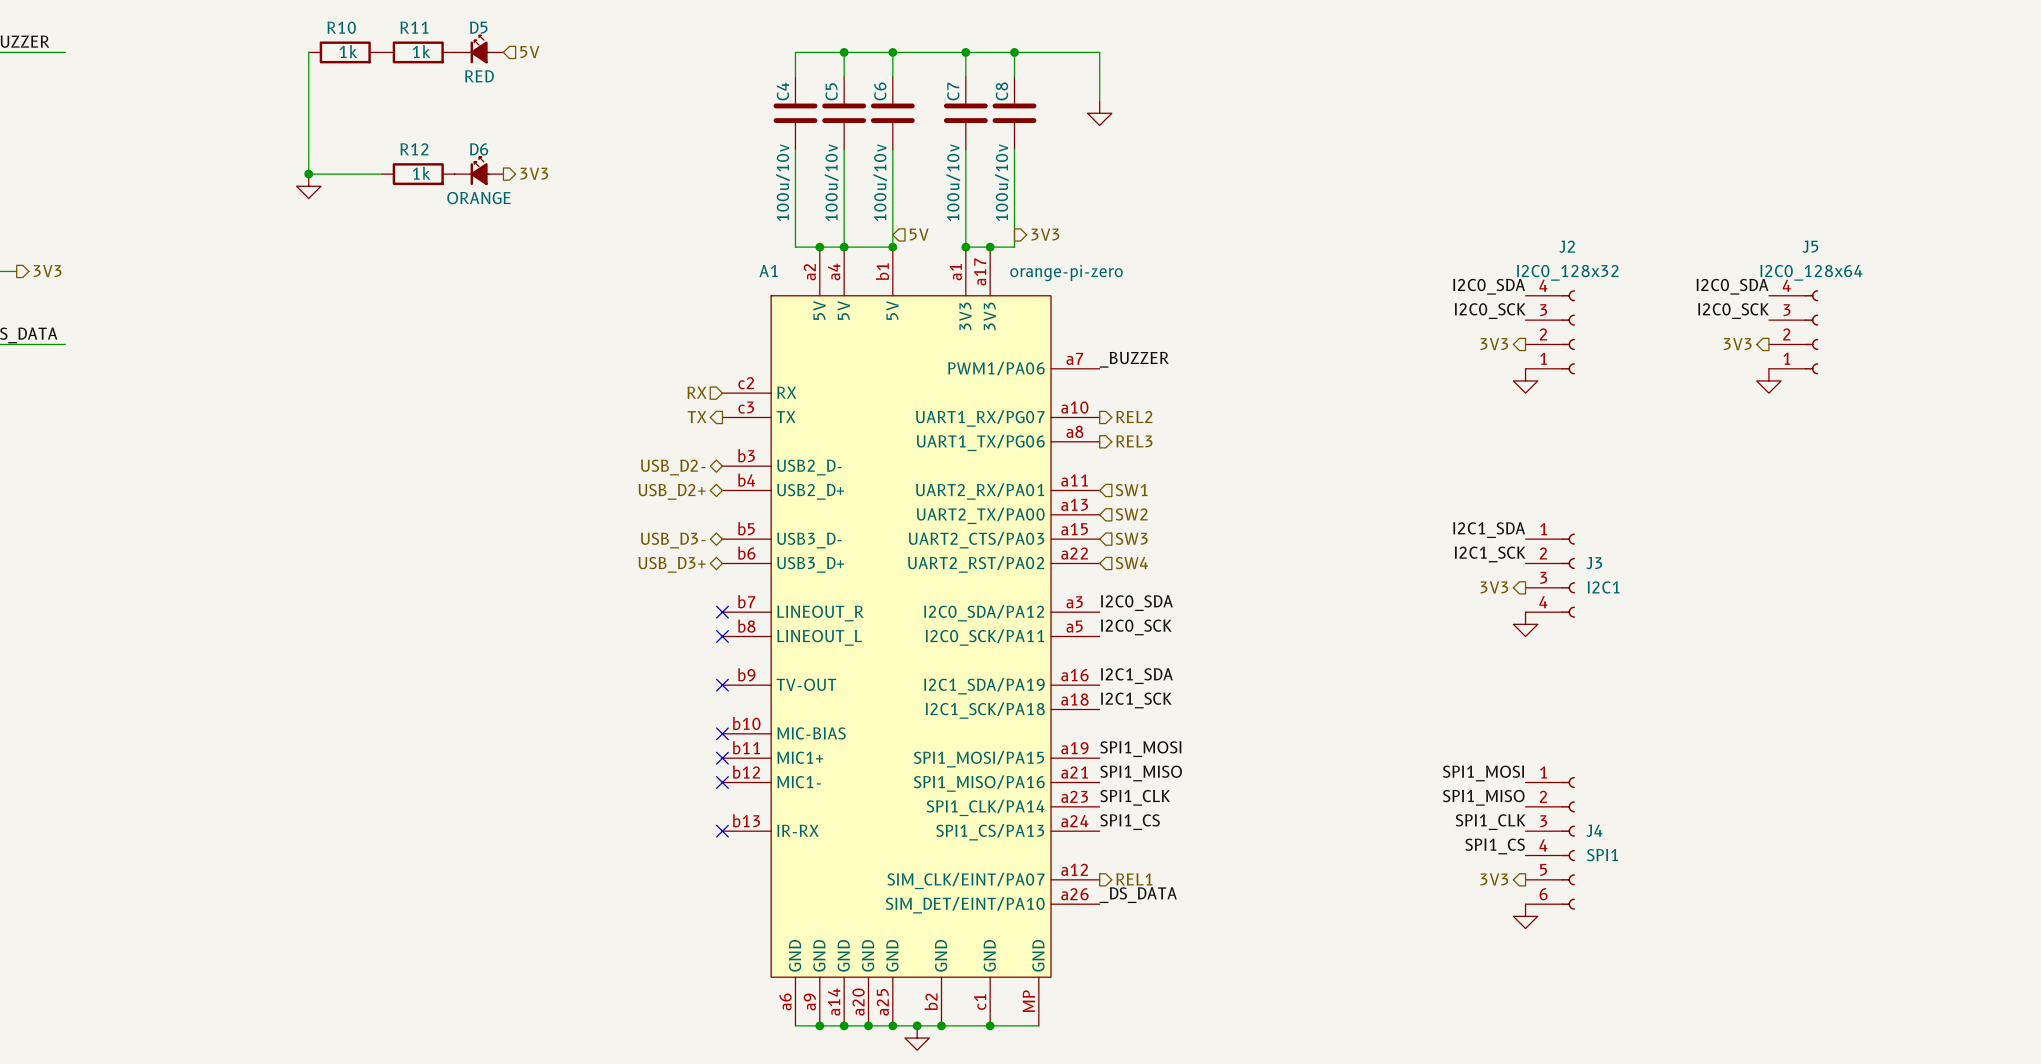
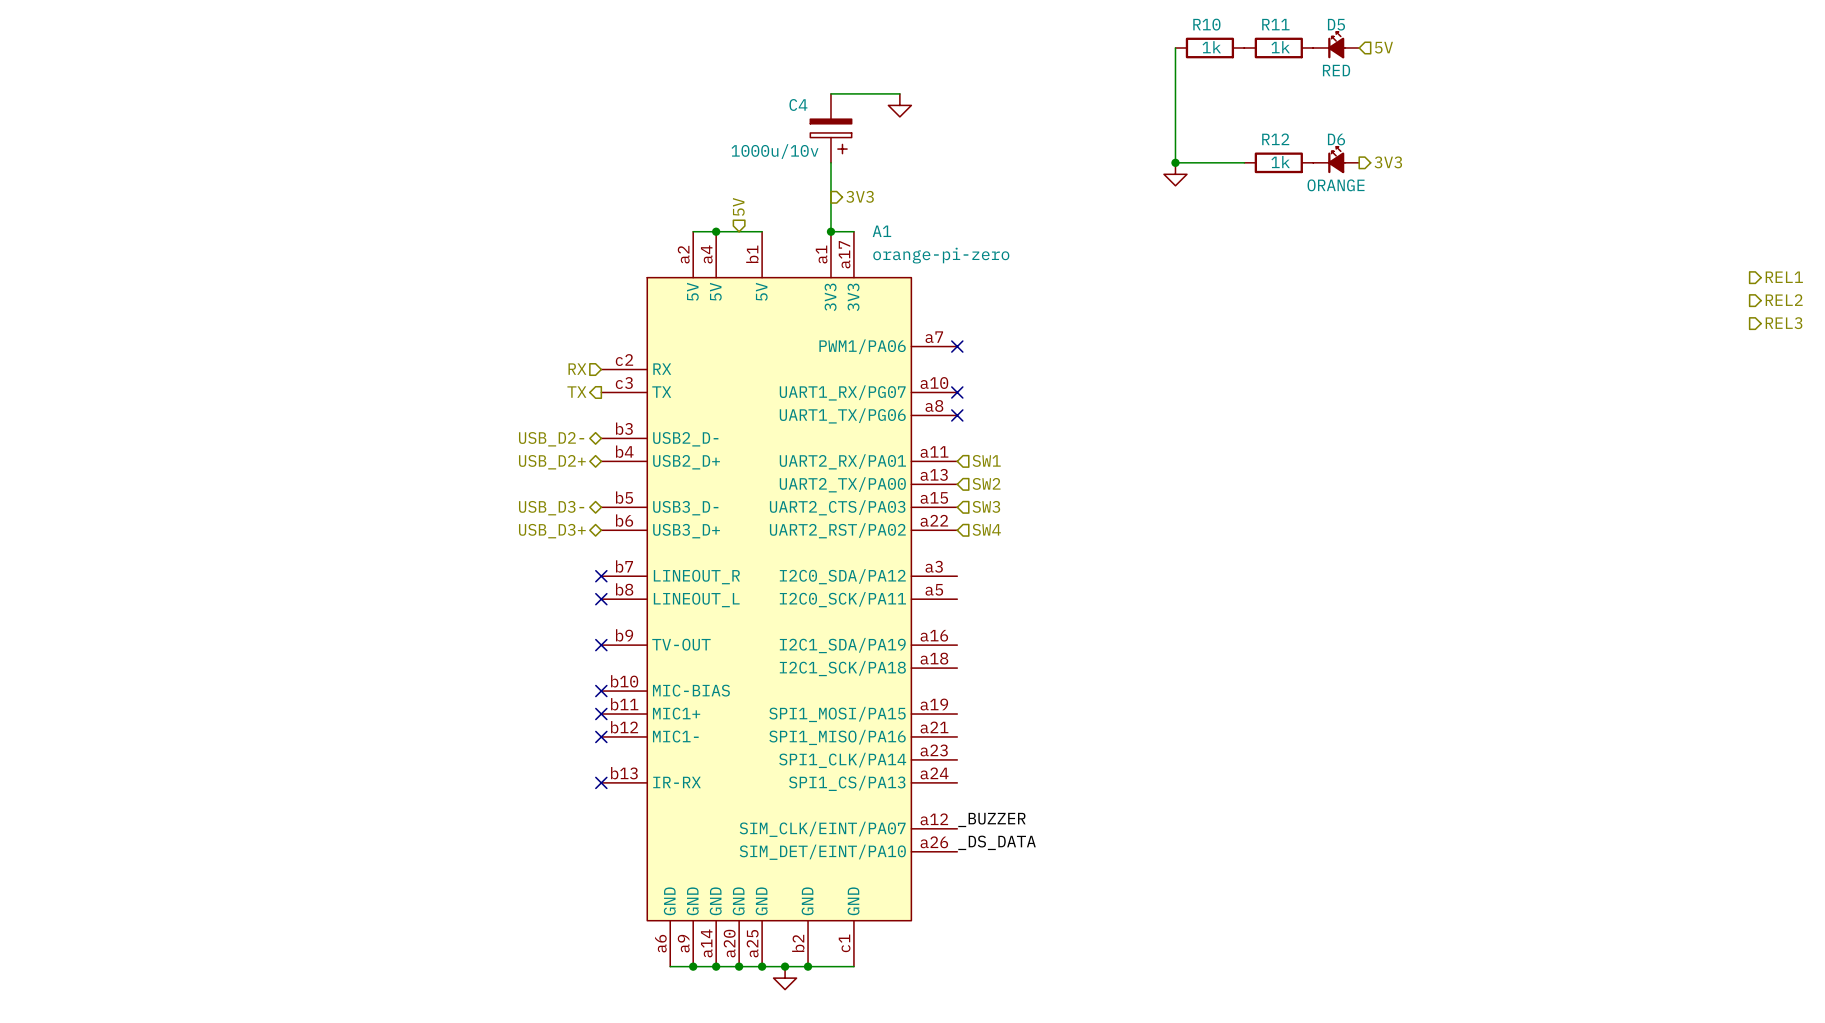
D5 position: (479, 49) -> (1336, 45)
wire: (308, 52) (308, 174) (381, 174) -> none
R10 position: (345, 52) -> (1209, 47)
R11 position: (418, 52) -> (1278, 47)
hierarchical label: 5V (529, 52) -> none
wire: (844, 52) (844, 76) -> none
junction: (844, 52) -> none
wire: (892, 52) (892, 76) -> none
junction: (892, 52) -> none
wire: (965, 52) (965, 76) -> none
junction: (965, 52) -> none
wire: (1014, 52) (1014, 76) -> none
junction: (1014, 52) -> none
wire: none -> (1175, 47) (1175, 162) (1244, 162)
hierarchical label: none -> 5V (1383, 47)
C4 symbol: [773, 76, 818, 150] -> [810, 93, 852, 163]
wire: (795, 76) (795, 52) (1099, 52) (1099, 101) -> none
C4 name position: C4 (782, 91) -> C4 (798, 104)
wire: none -> (830, 93) (899, 93)
C5: 100u/10v (844, 113) -> none
C6: 100u/10v (892, 113) -> none
C7: 100u/10v (965, 113) -> none
C8: 100u/10v (1014, 113) -> none
power symbol position: (1099, 113) -> (899, 105)
wire: (795, 149) (795, 247) (819, 247) -> none
wire: (844, 149) (844, 247) -> none
wire: (892, 149) (892, 247) -> none
wire: (1014, 149) (1014, 247) (990, 247) -> none
D6 position: (479, 171) -> (1336, 159)
hierarchical label: 3V3 (534, 173) -> none
hierarchical label: none -> 3V3 (1388, 162)
junction: (308, 174) -> none
R12 position: (418, 174) -> (1278, 162)
junction: none -> (1175, 162)
C4 value: 100u/10v (782, 182) -> 1000u/10v (774, 151)
power symbol: (308, 186) -> none
power symbol: none -> (1175, 174)
hierarchical label rotation: 0° (919, 234) -> 90° counterclockwise (738, 206)
hierarchical label position: 5V (919, 234) -> 5V (738, 206)
hierarchical label position: 3V3 (1045, 234) -> 3V3 (860, 196)
A1 symbol: [722, 247, 1100, 1026] -> [601, 231, 958, 967]
junction: (819, 247) -> none
junction: (892, 247) -> none
junction: (990, 247) -> none
A1 name position: A1 (768, 270) -> A1 (881, 231)
label: I2C0_SDA (1489, 286) -> none
label: I2C0_SDA (1732, 286) -> none
hierarchical label: none -> REL1 (1784, 277)
label: I2C0_SCK (1490, 311) -> none
label: I2C0_SCK (1733, 311) -> none
hierarchical label: none -> REL2 (1784, 300)
J2: I2C0_128x32 (1550, 332) -> none
J5: I2C0_128x64 (1793, 332) -> none
hierarchical label: 3V3 (1494, 344) -> none
hierarchical label: 3V3 (1737, 344) -> none
hierarchical label: none -> REL3 (1784, 323)
label: _BUZZER (1134, 359) -> none
no-connect mark: none -> (957, 346)
power symbol: (1525, 380) -> none
power symbol: (1768, 380) -> none
no-connect mark: none -> (957, 392)
hierarchical label: REL2 (1134, 417) -> none
no-connect mark: none -> (957, 415)
hierarchical label: REL3 (1134, 441) -> none
label: I2C1_SDA (1489, 530) -> none
label: I2C1_SCK (1490, 554) -> none
J3: I2C1 (1550, 575) -> none
hierarchical label: 3V3 (1494, 587) -> none
label: I2C0_SDA (1136, 603) -> none
power symbol: (1525, 624) -> none
label: I2C0_SCK (1136, 627) -> none
label: I2C1_SDA (1136, 676) -> none
label: I2C1_SCK (1136, 700) -> none
label: SPI1_MOSI (1140, 749) -> none
label: SPI1_MISO (1141, 773) -> none
label: SPI1_MOSI (1483, 773) -> none
label: SPI1_CLK (1135, 797) -> none
label: SPI1_MISO (1483, 797) -> none
label: SPI1_CS (1130, 822) -> none
label: SPI1_CLK (1490, 822) -> none
J4: SPI1 (1550, 843) -> none
label: SPI1_CS (1495, 846) -> none
label: none -> _BUZZER (991, 819)
hierarchical label: REL1 (1134, 879) -> none
hierarchical label: 3V3 (1494, 879) -> none
power symbol: (1525, 916) -> none
wire: (990, 1025) (1038, 1025) -> none
junction: (990, 1025) -> none

